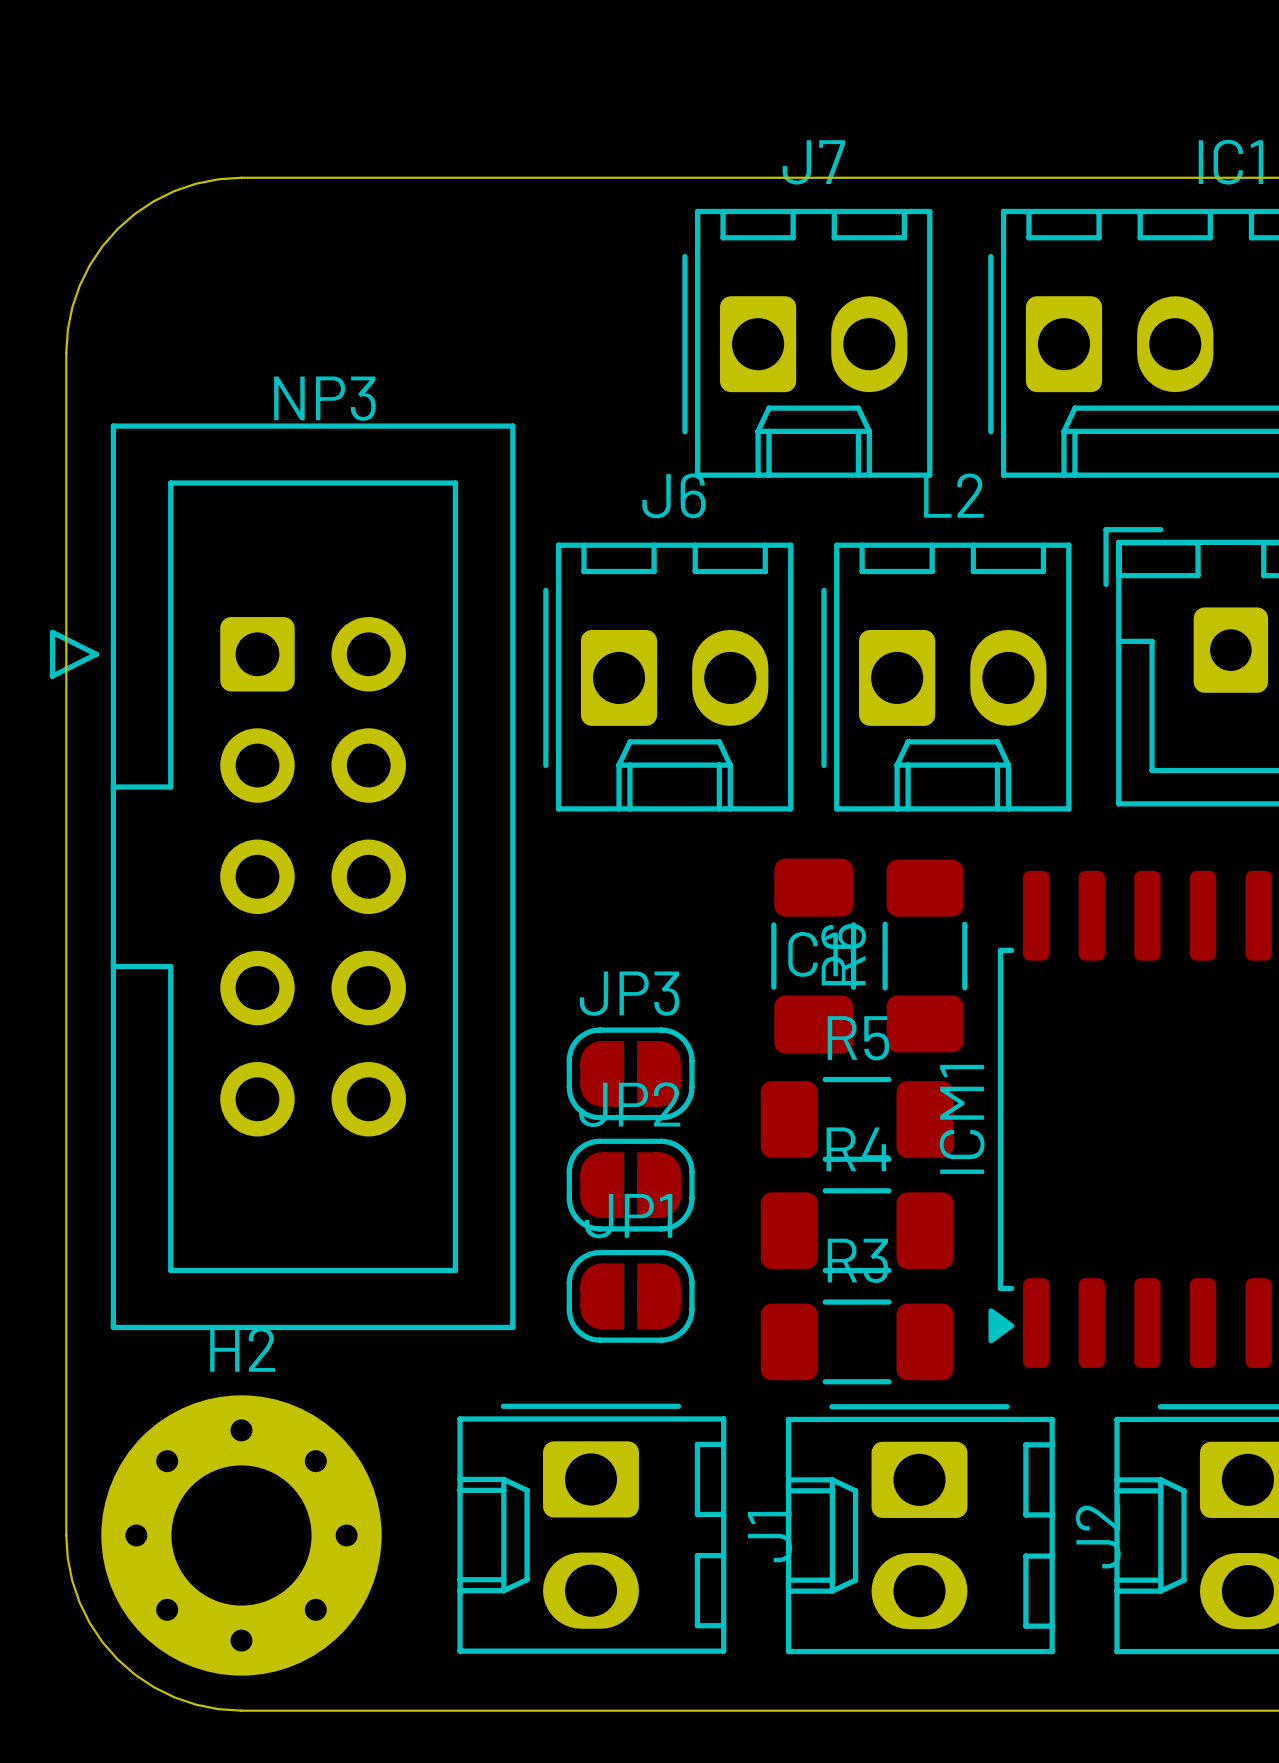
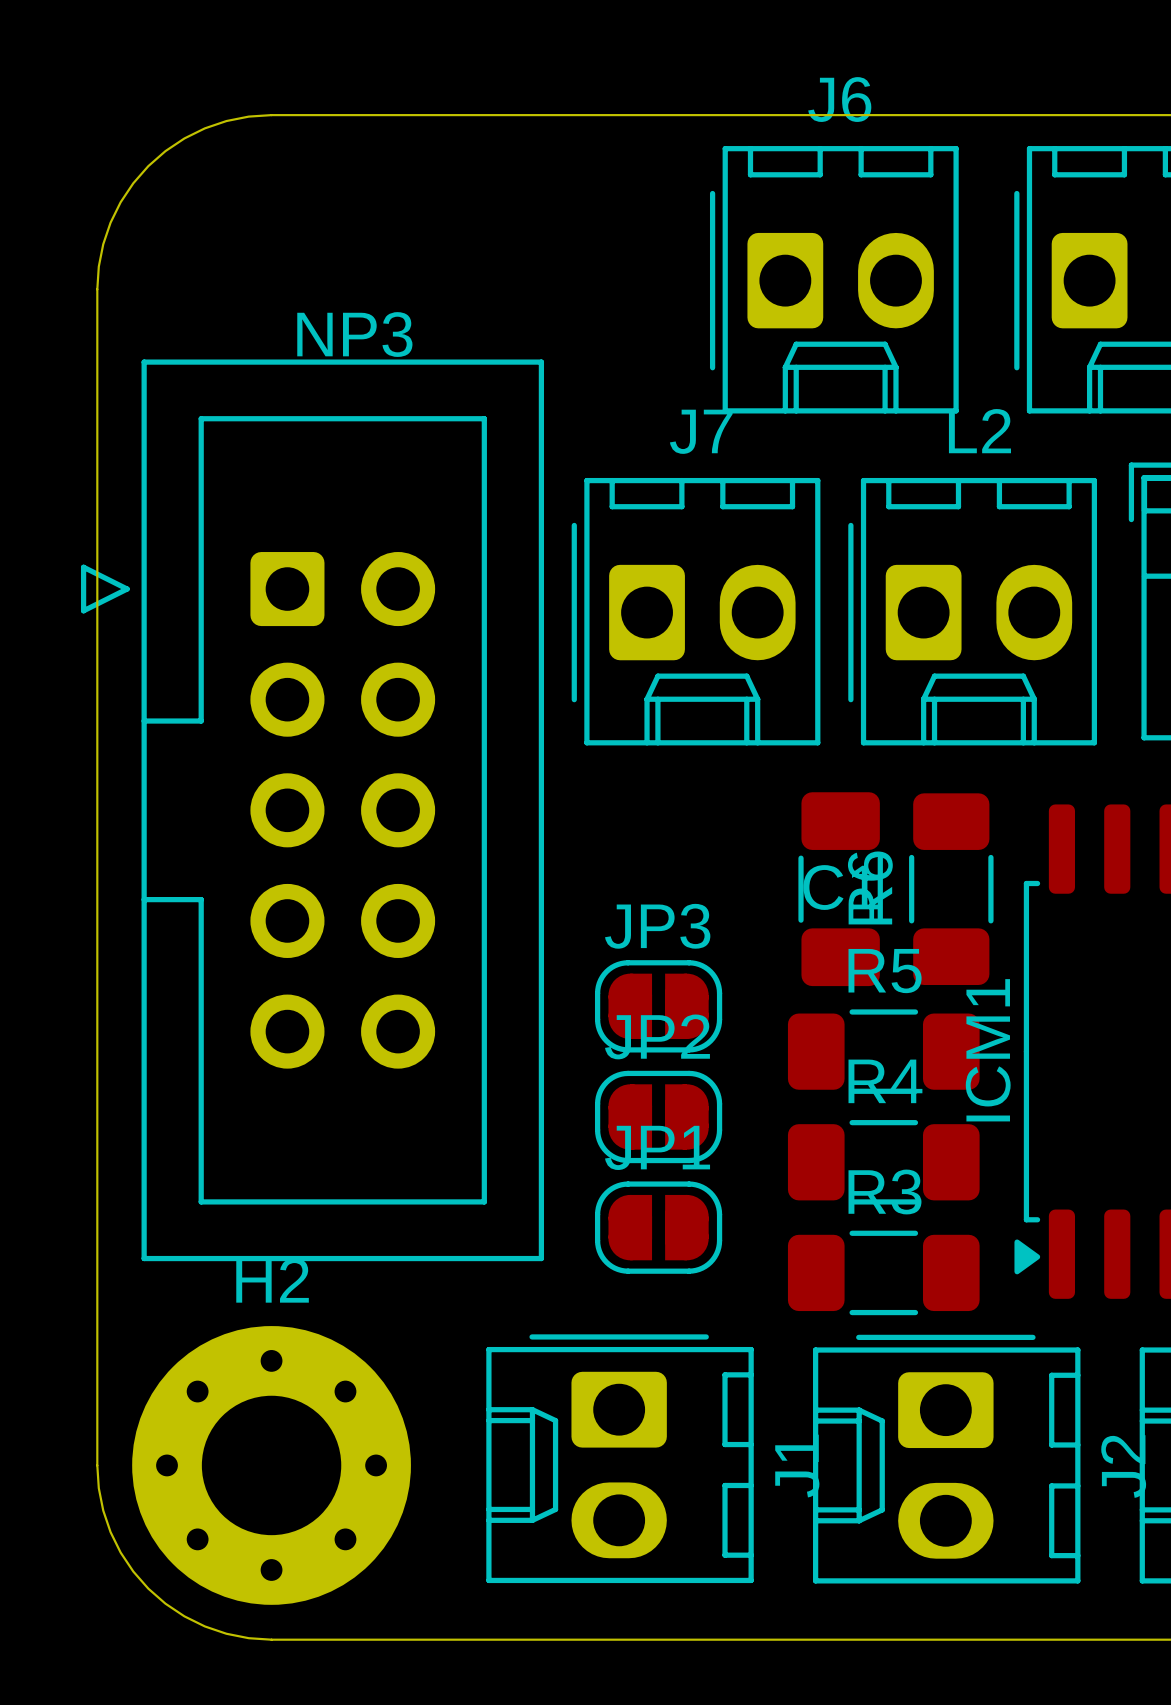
J7 name: J7 (813, 162) -> J6 (839, 99)
J6 name: J6 (673, 495) -> J7 (701, 431)

